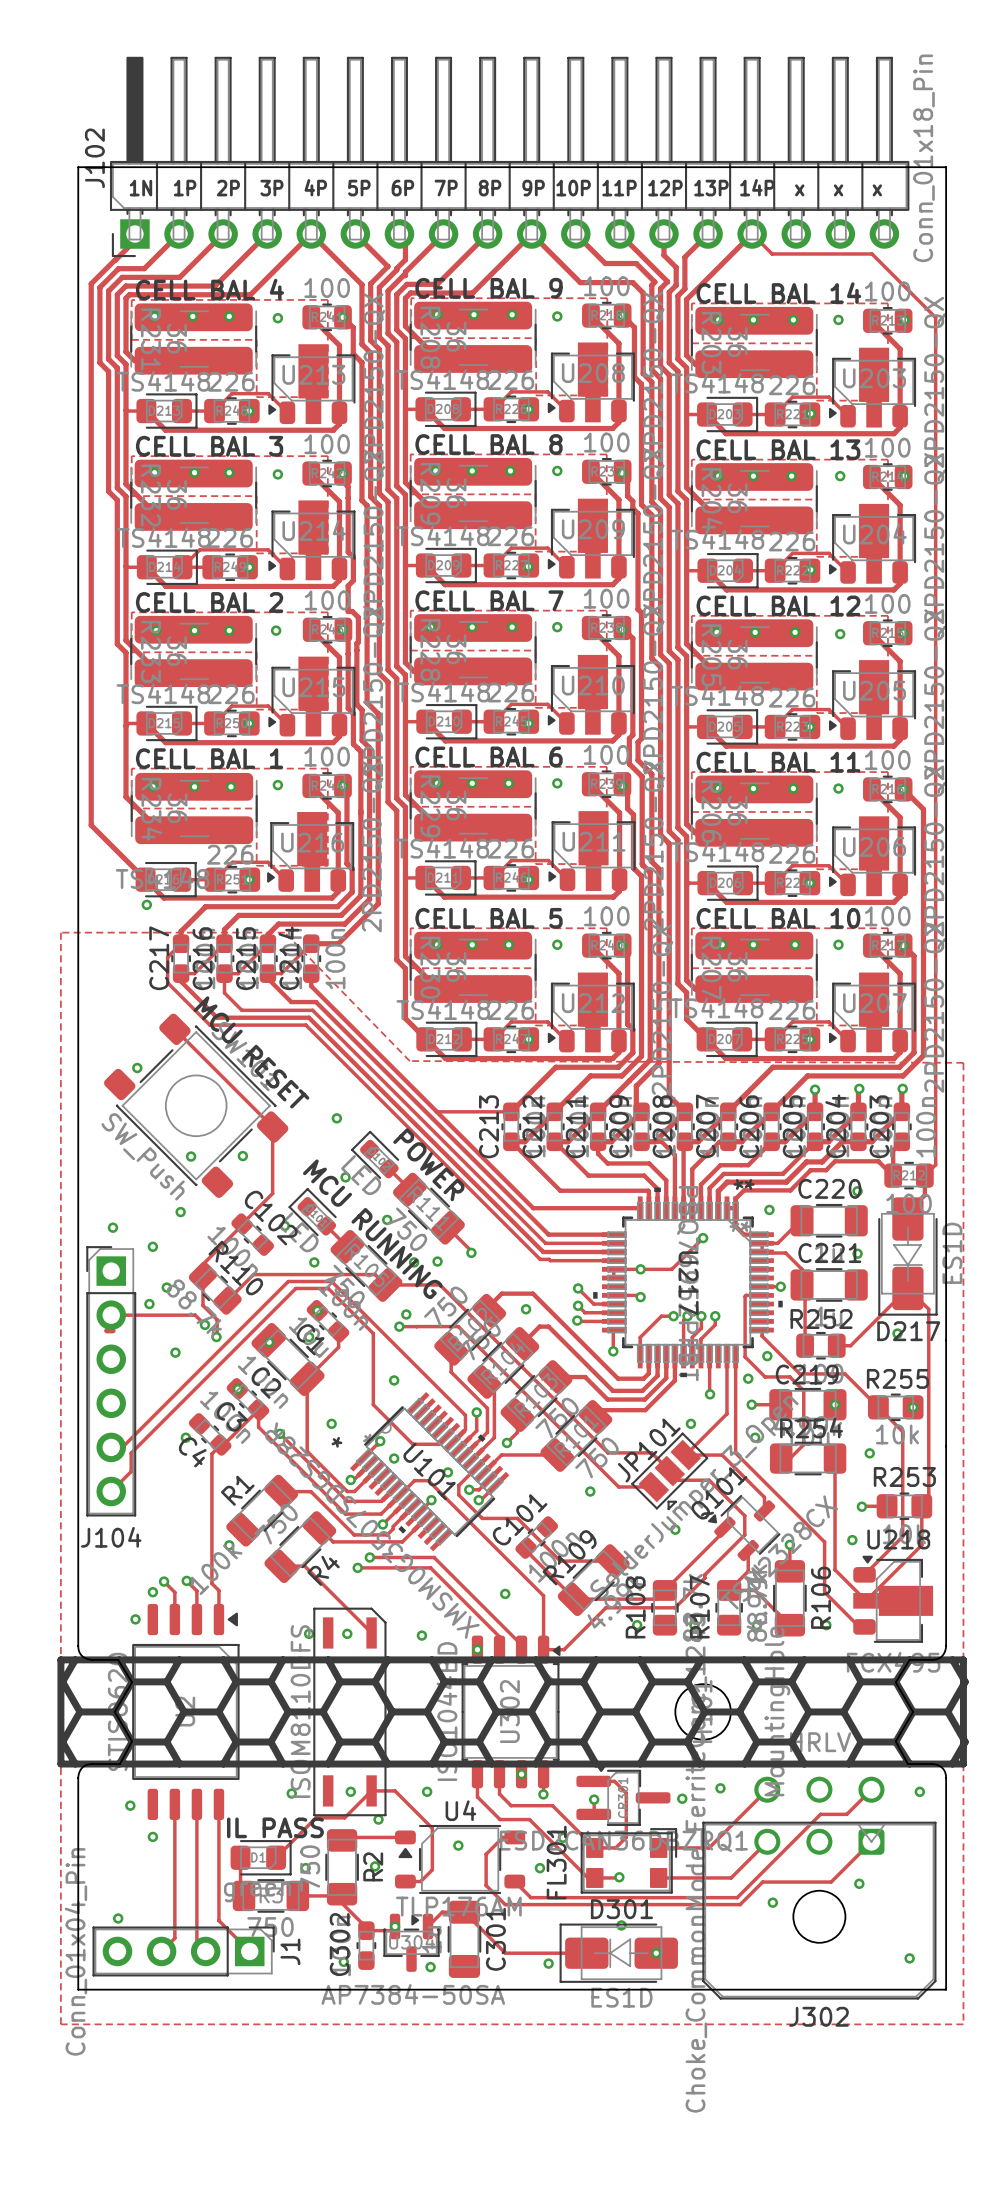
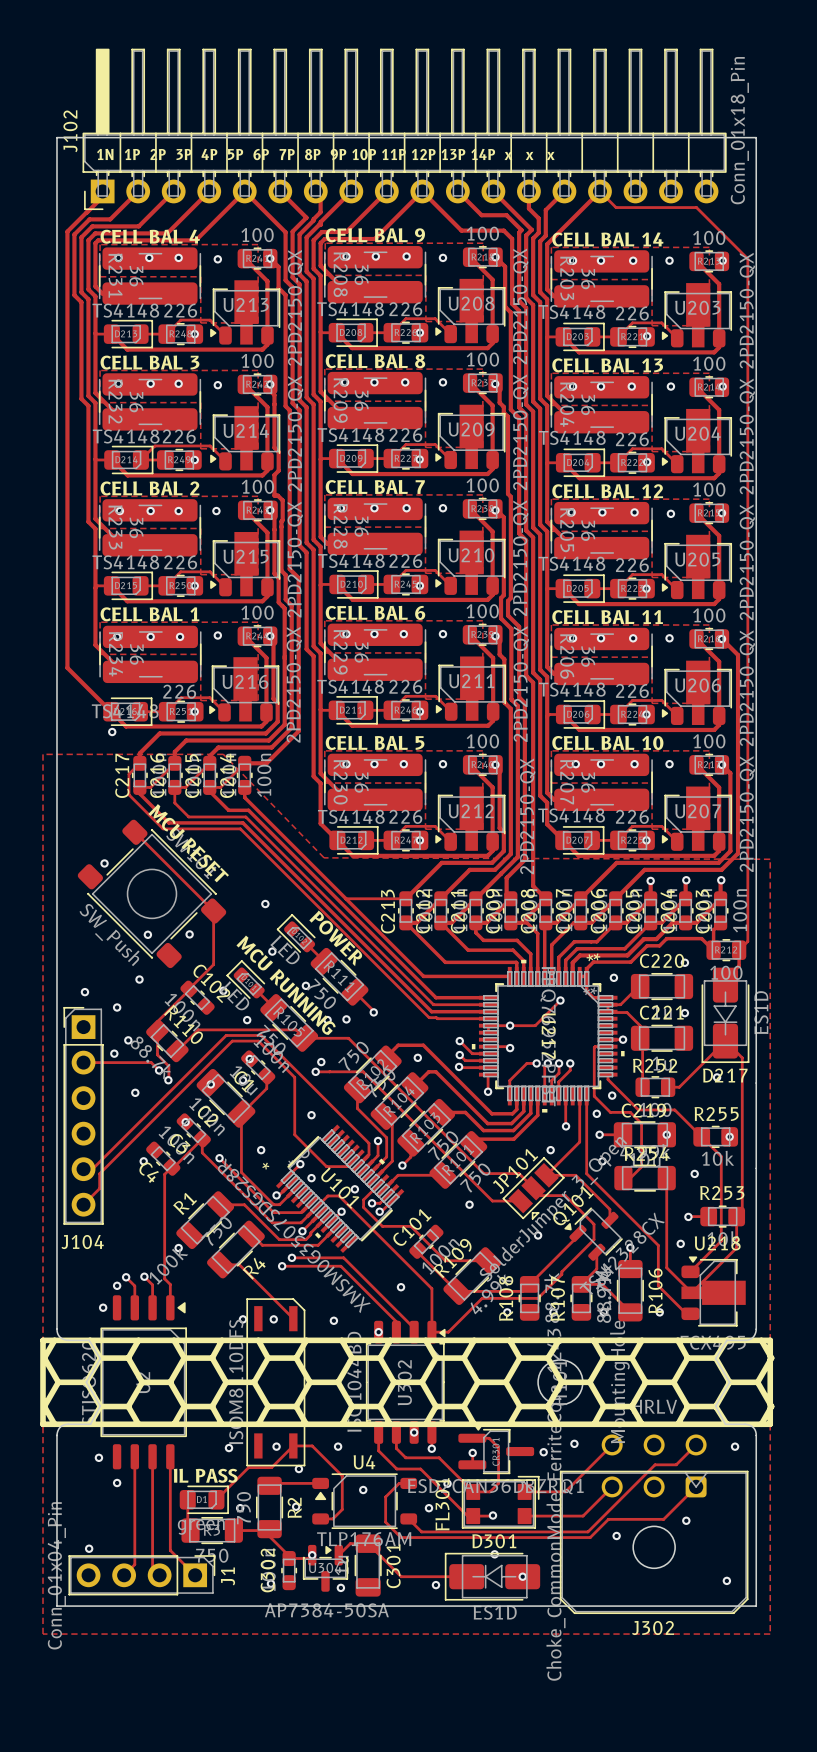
track: (106, 1330) (112, 1330) -> none

